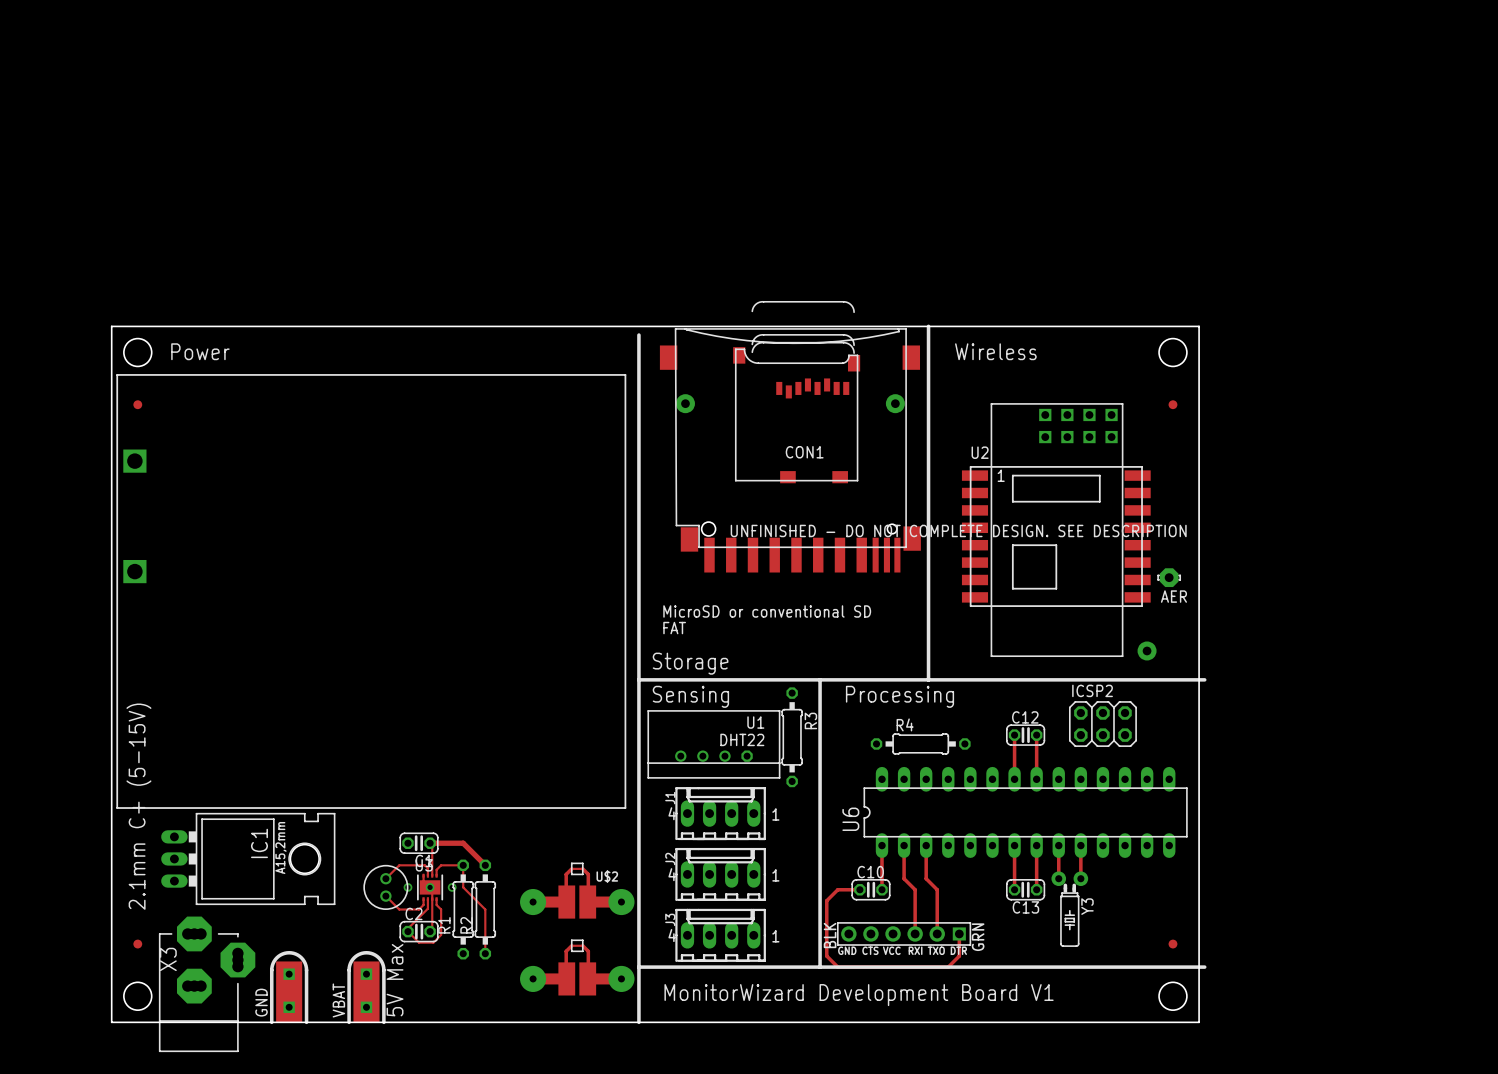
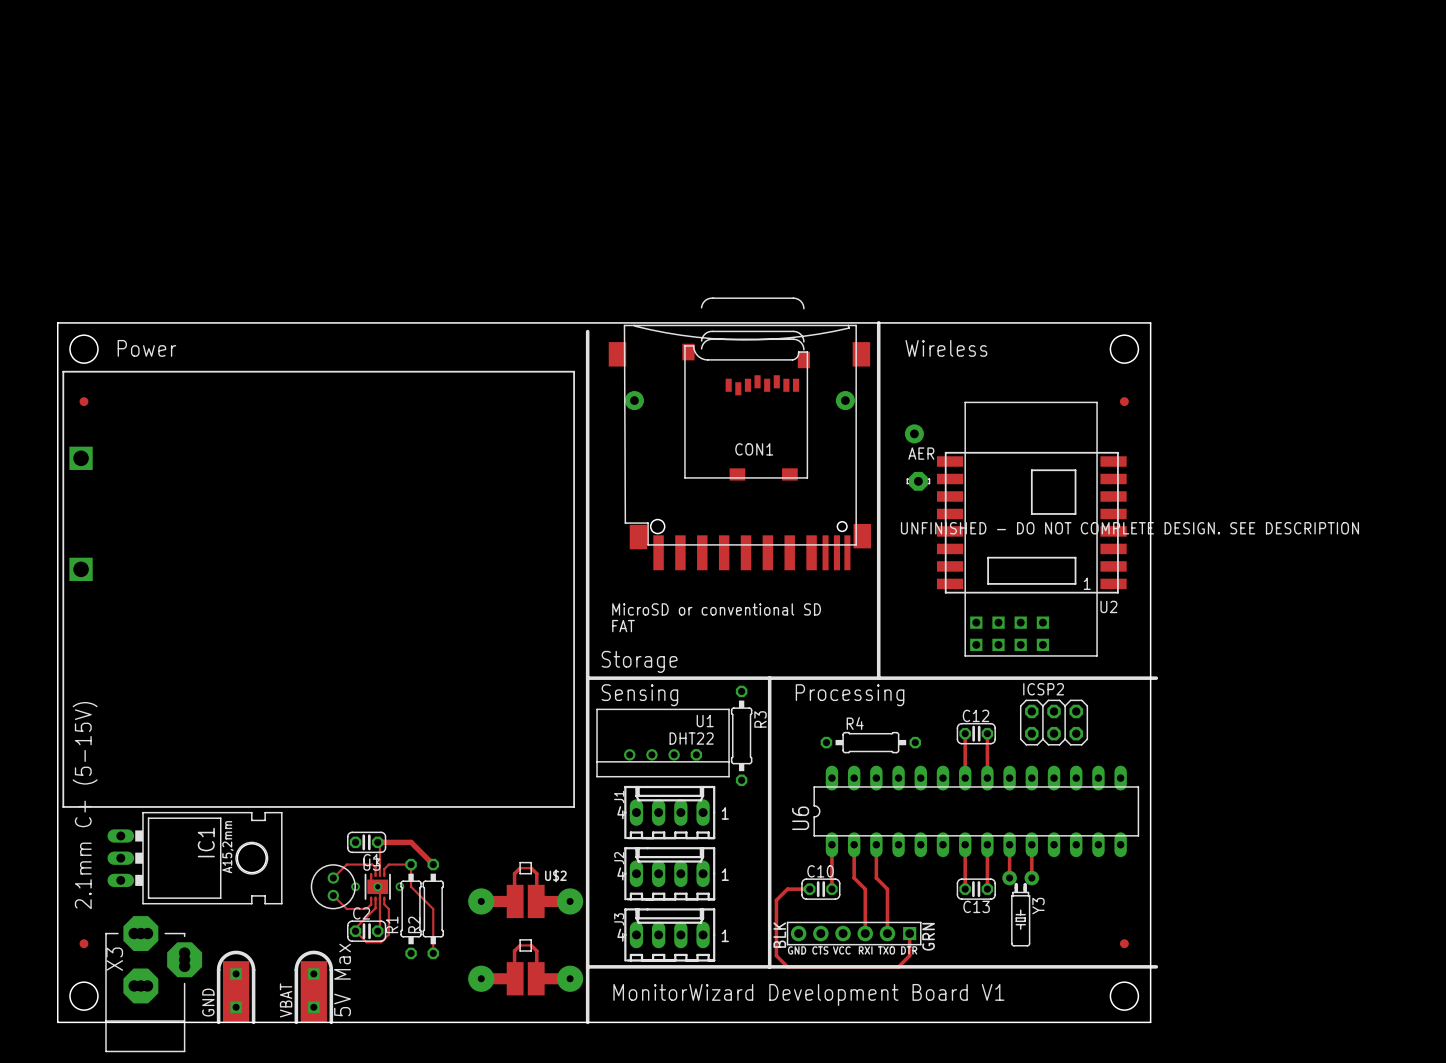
via: none -> (914, 433)
U2 name position: U2 (980, 452) -> U2 (1108, 606)
U2 footprint: [961, 466, 1151, 607] -> [936, 451, 1127, 594]
AER: none -> (918, 481)
part: (1057, 530) -> none
part: none -> (1031, 529)
AER: (1169, 577) -> none
via: (1147, 650) -> none

